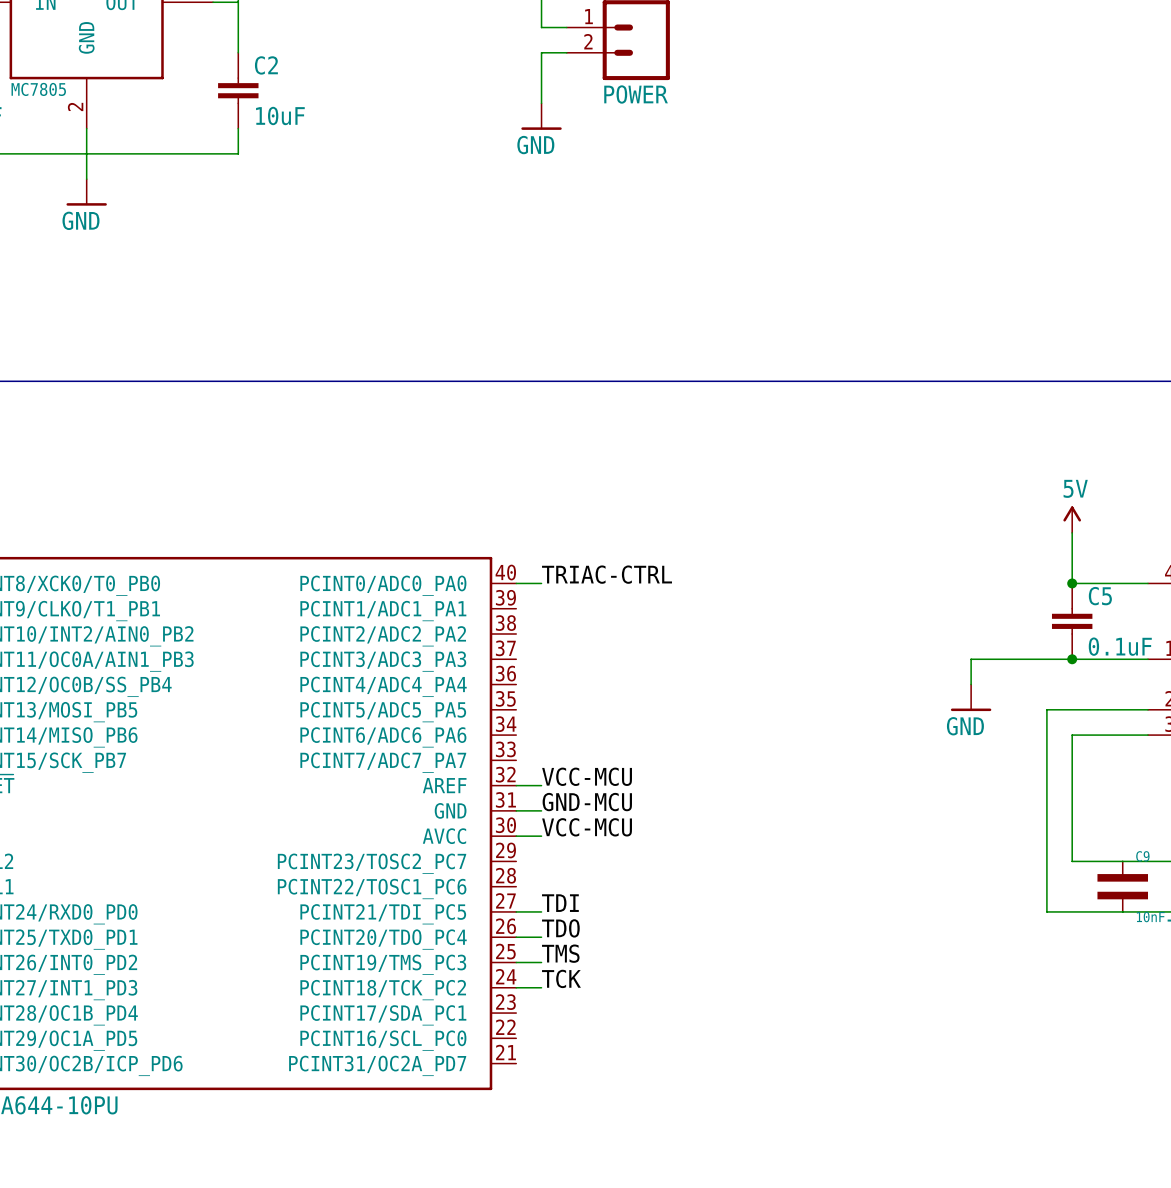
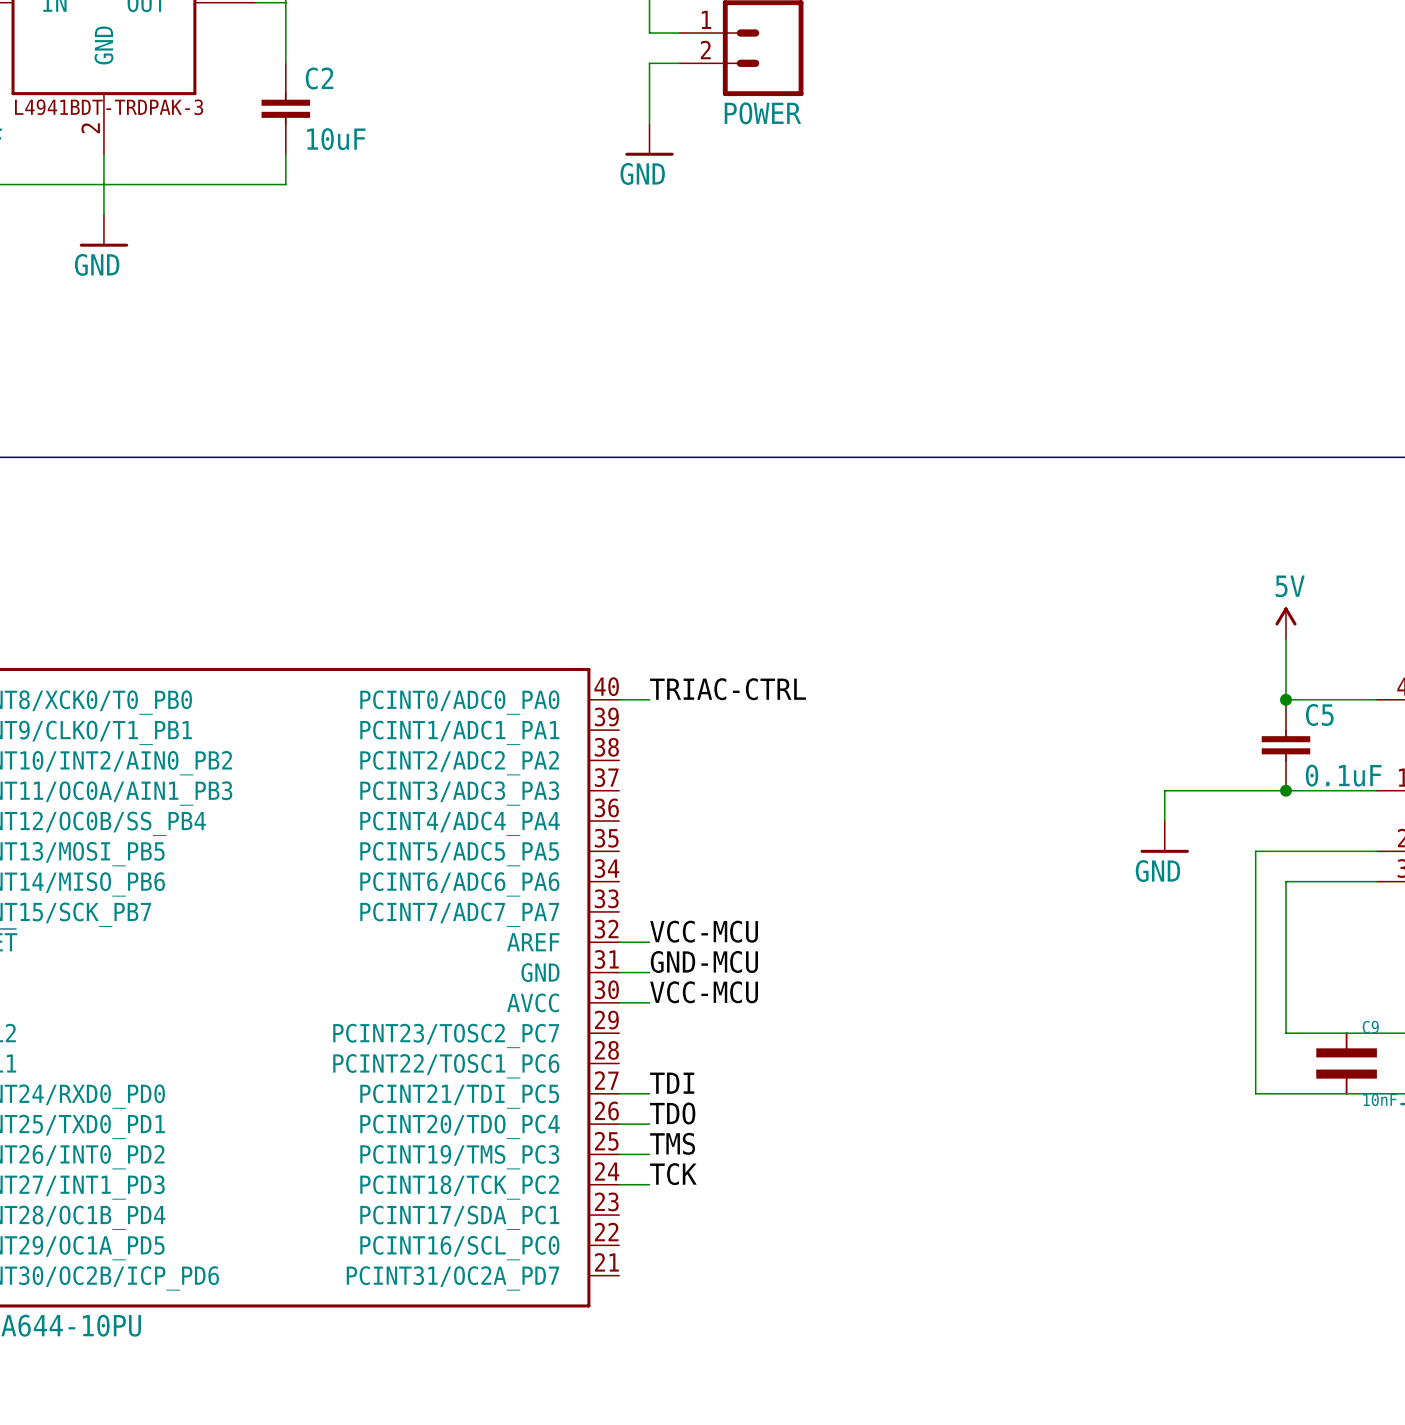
part value: MC7805 (38, 89) -> L4941BDT-TRDPAK-3 (109, 107)

